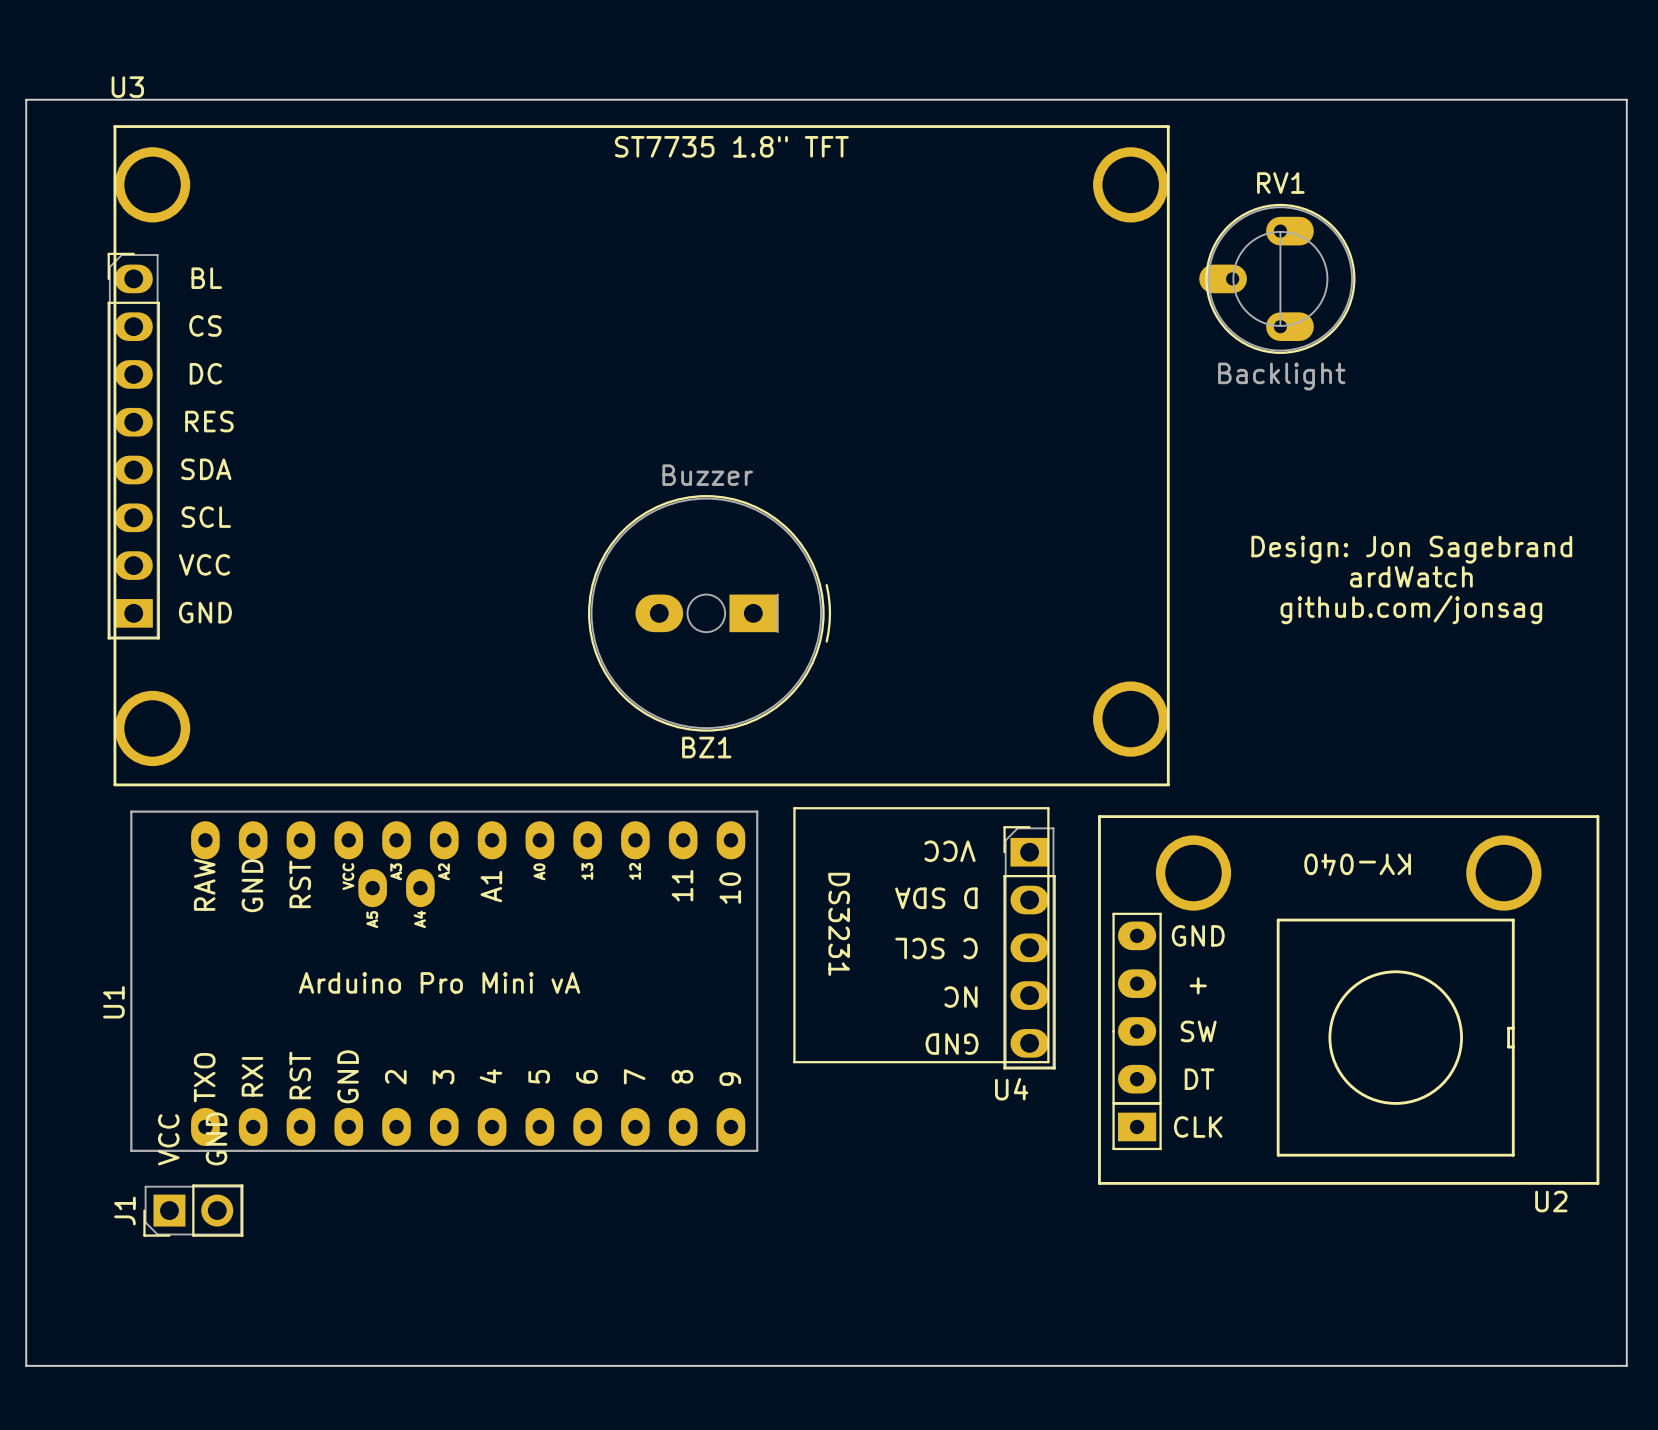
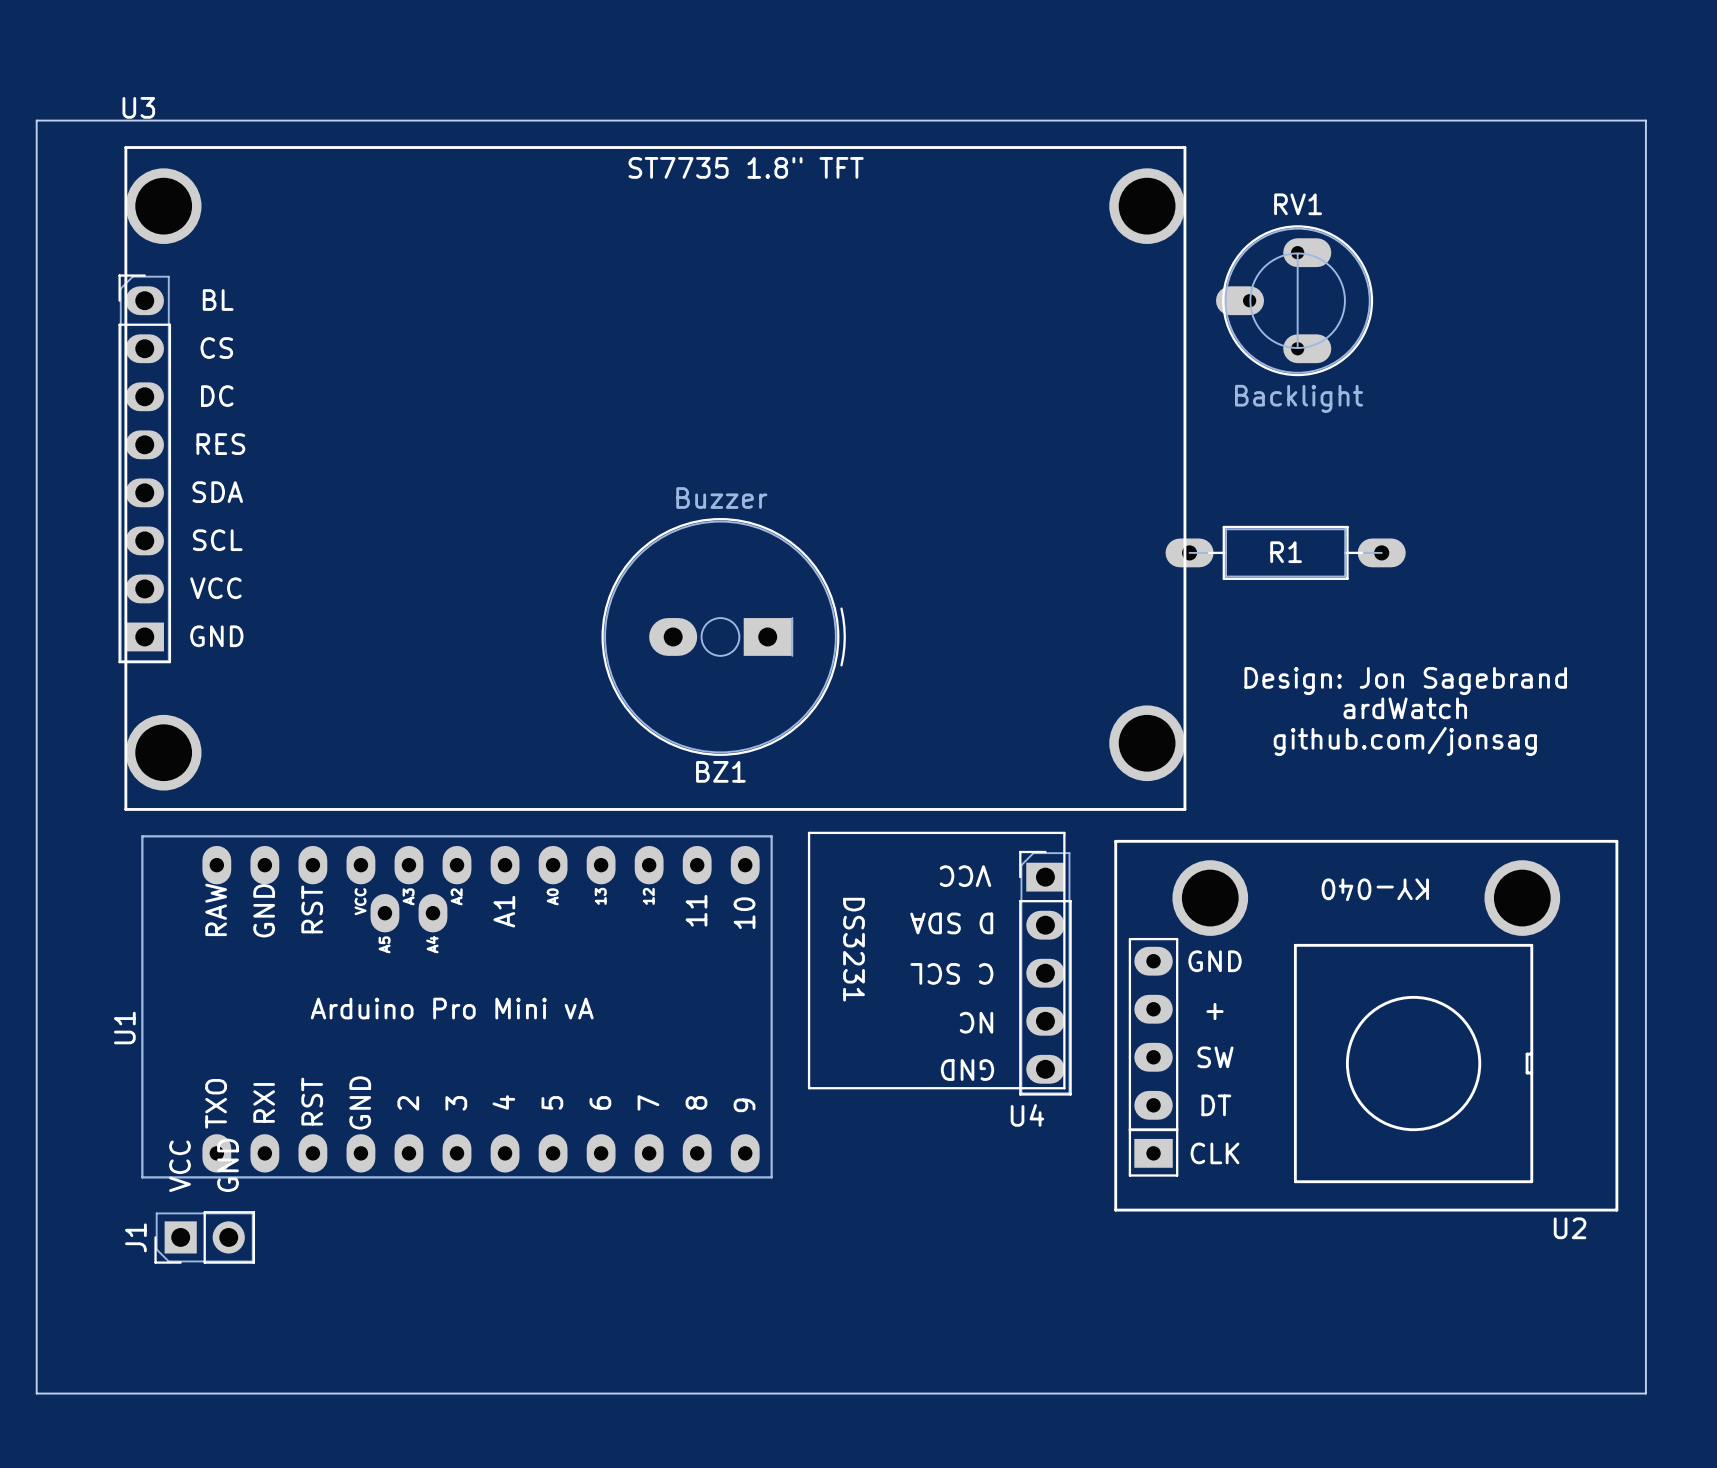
R1: none -> (1285, 552)
text position: Design: Jon Sagebrand (1411, 549) -> Design: Jon Sagebrand (1405, 681)
text position: ardWatch (1411, 576) -> ardWatch (1405, 708)
text position: github.com/jonsag (1411, 609) -> github.com/jonsag (1405, 741)

